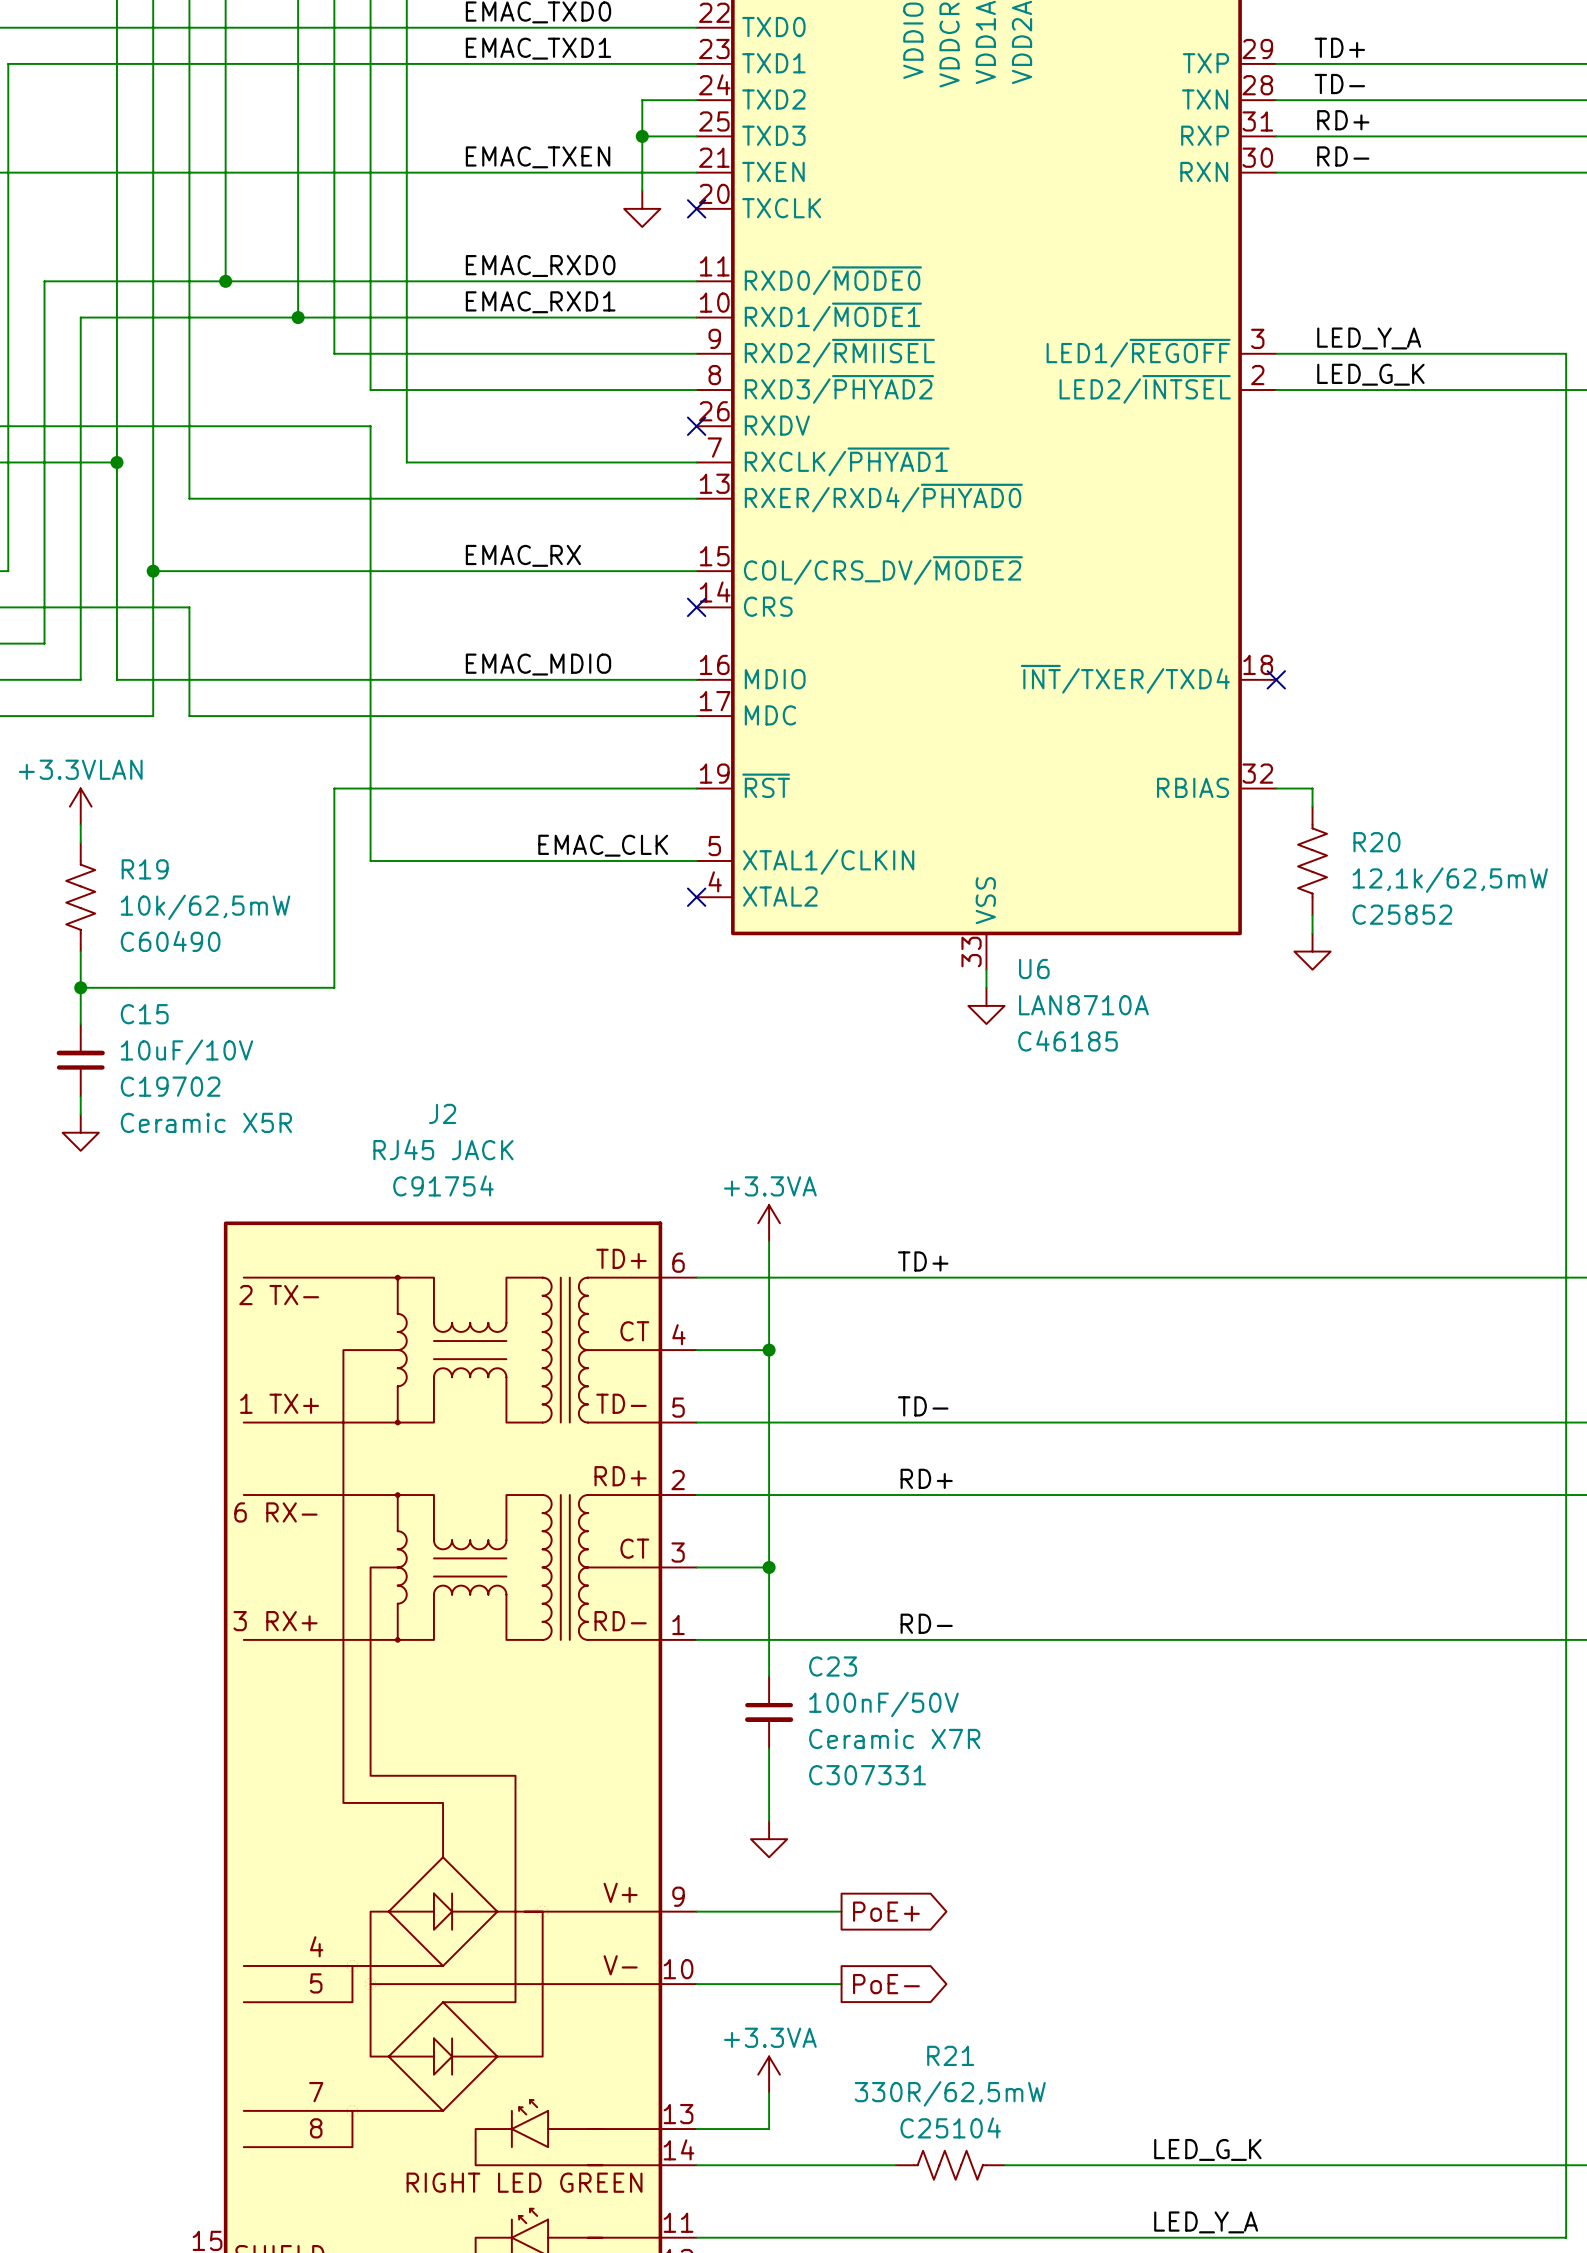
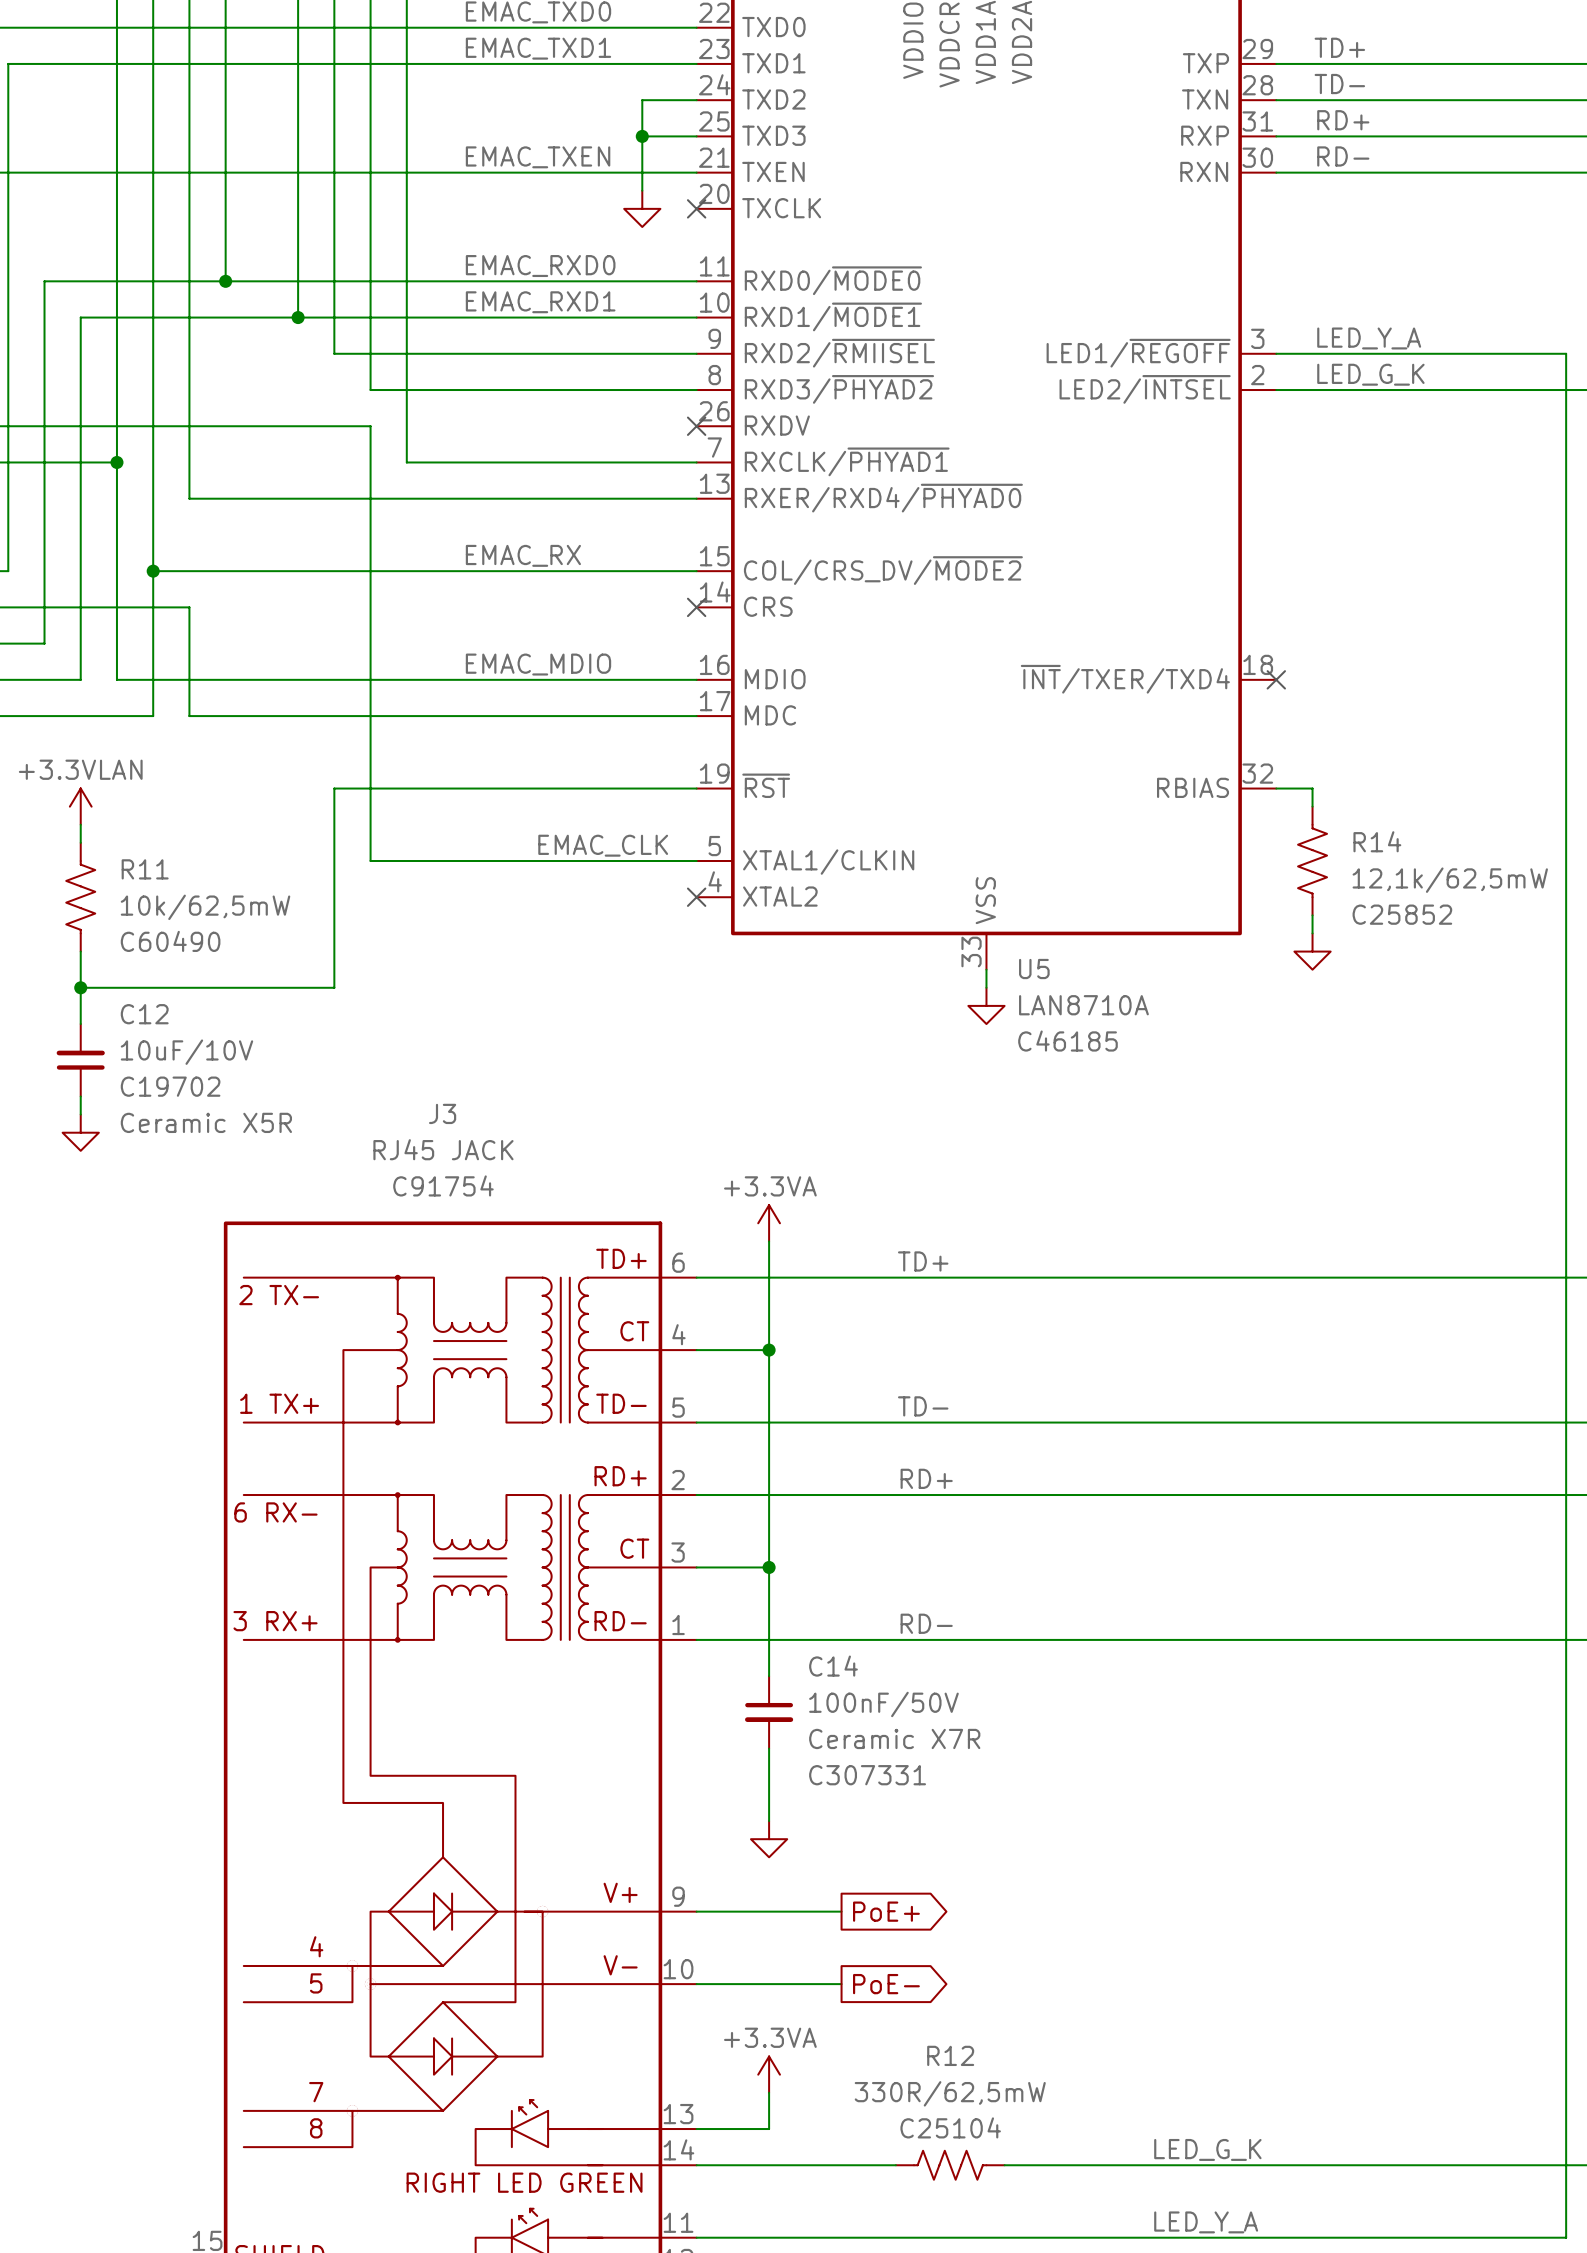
R20 name: R20 (1376, 842) -> R14 (1377, 841)
R19 name: R19 (145, 869) -> R11 (145, 869)
U6 name: U6 (1034, 969) -> U5 (1034, 969)
C15 name: C15 (144, 1014) -> C12 (144, 1014)
J2 name: J2 (442, 1113) -> J3 (442, 1113)
C23 name: C23 (833, 1666) -> C14 (833, 1666)
R21 name: R21 (950, 2055) -> R12 (950, 2055)

